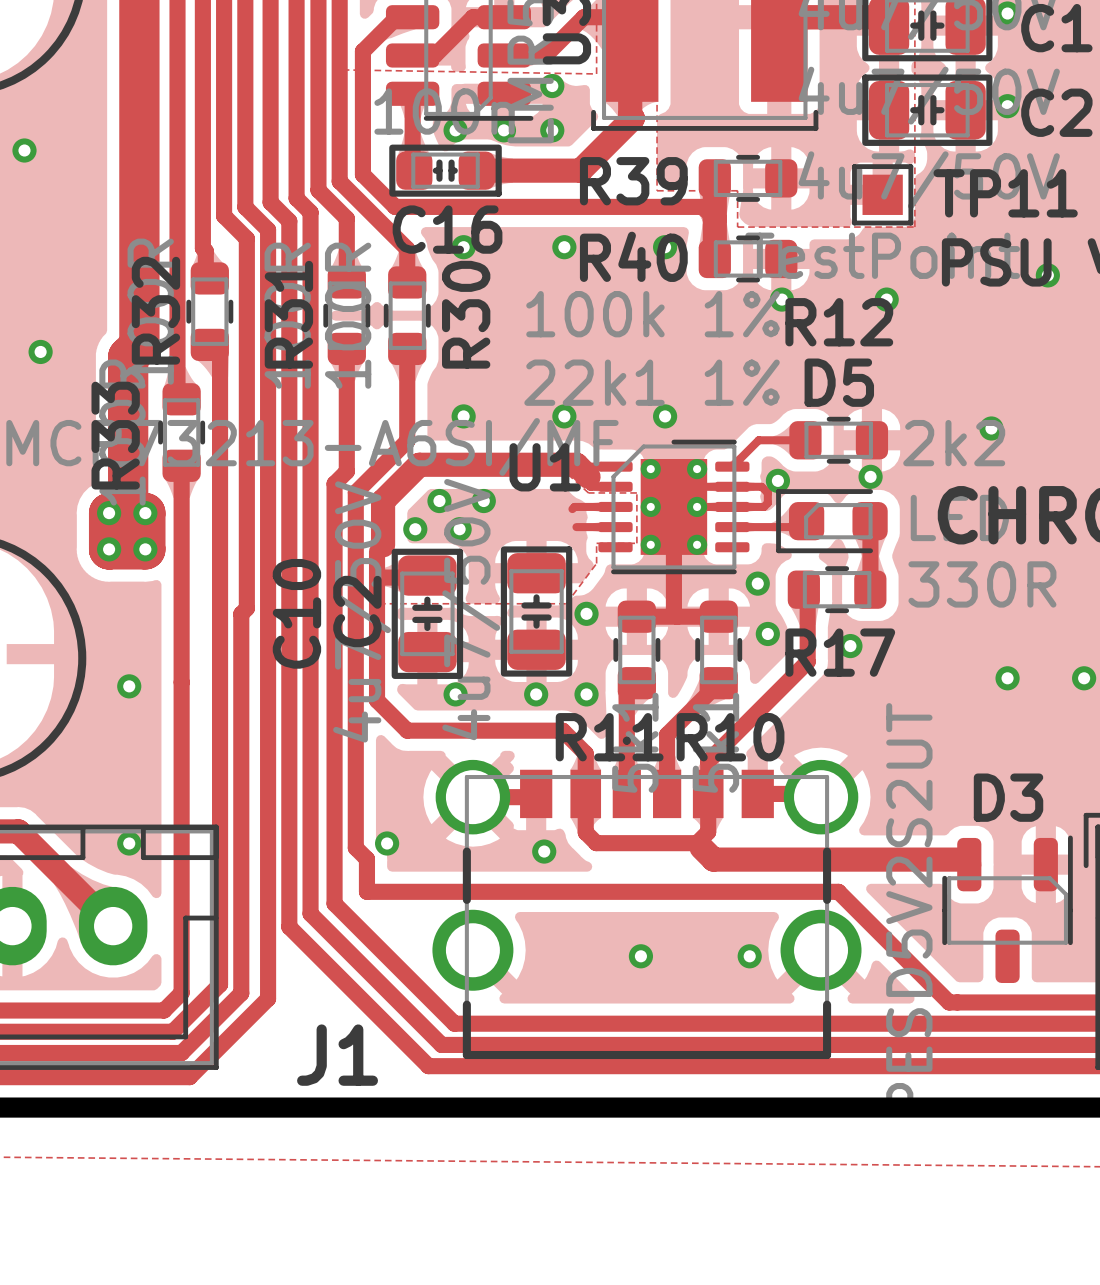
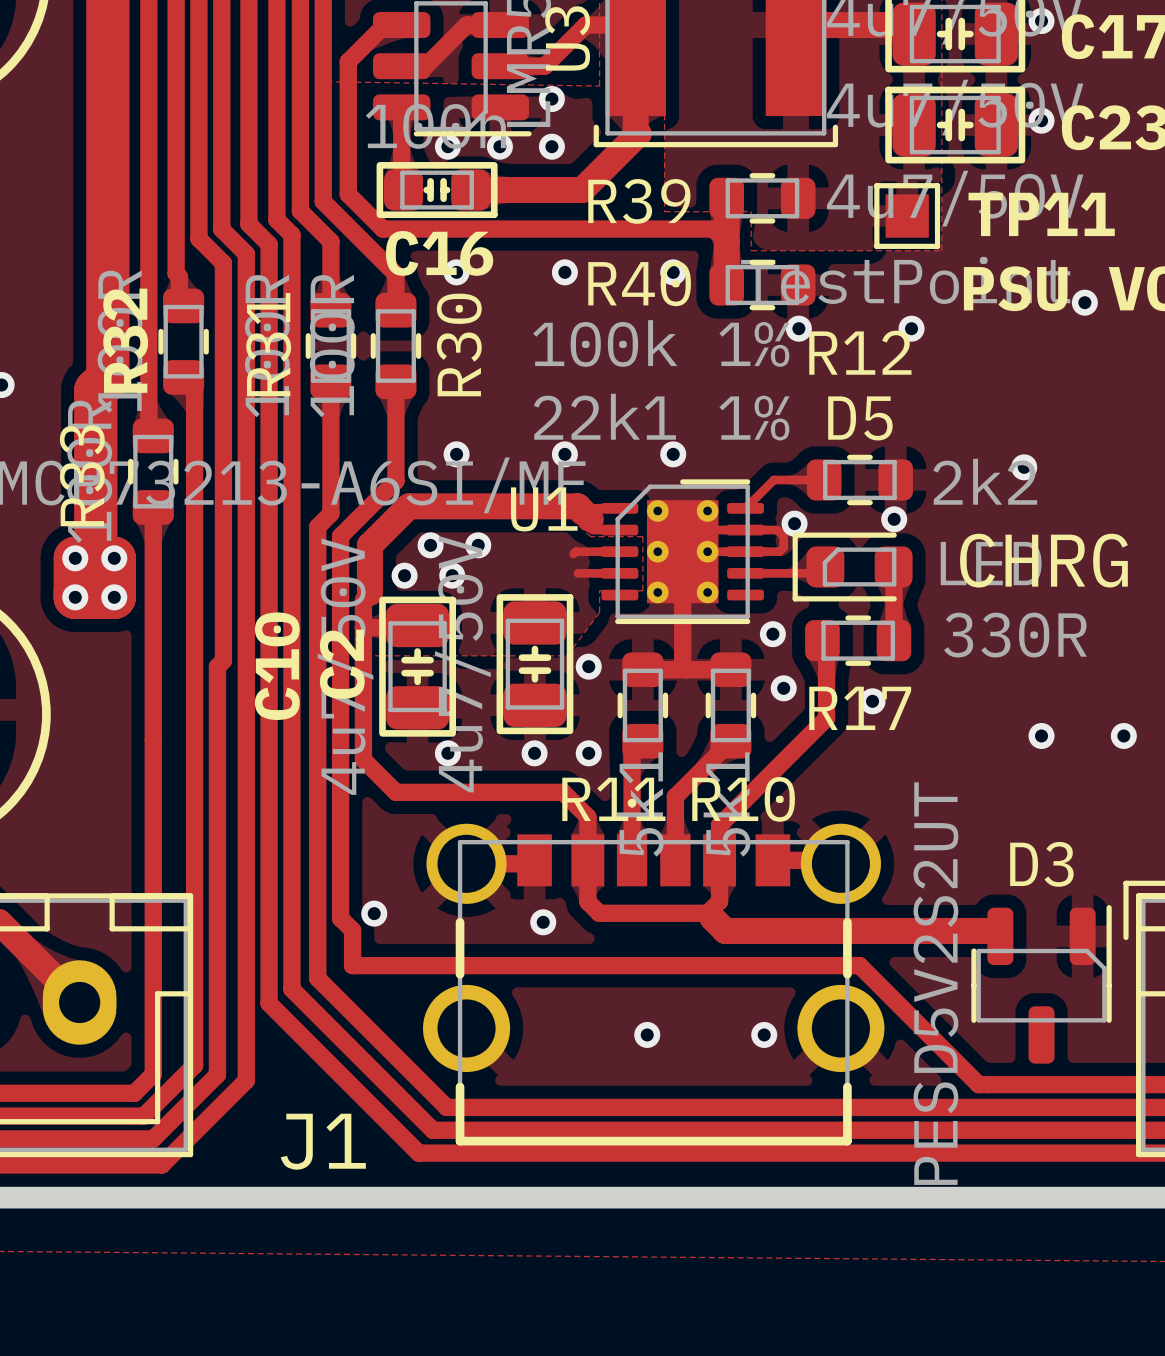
via: (129, 686) -> none
via: (129, 843) -> none

